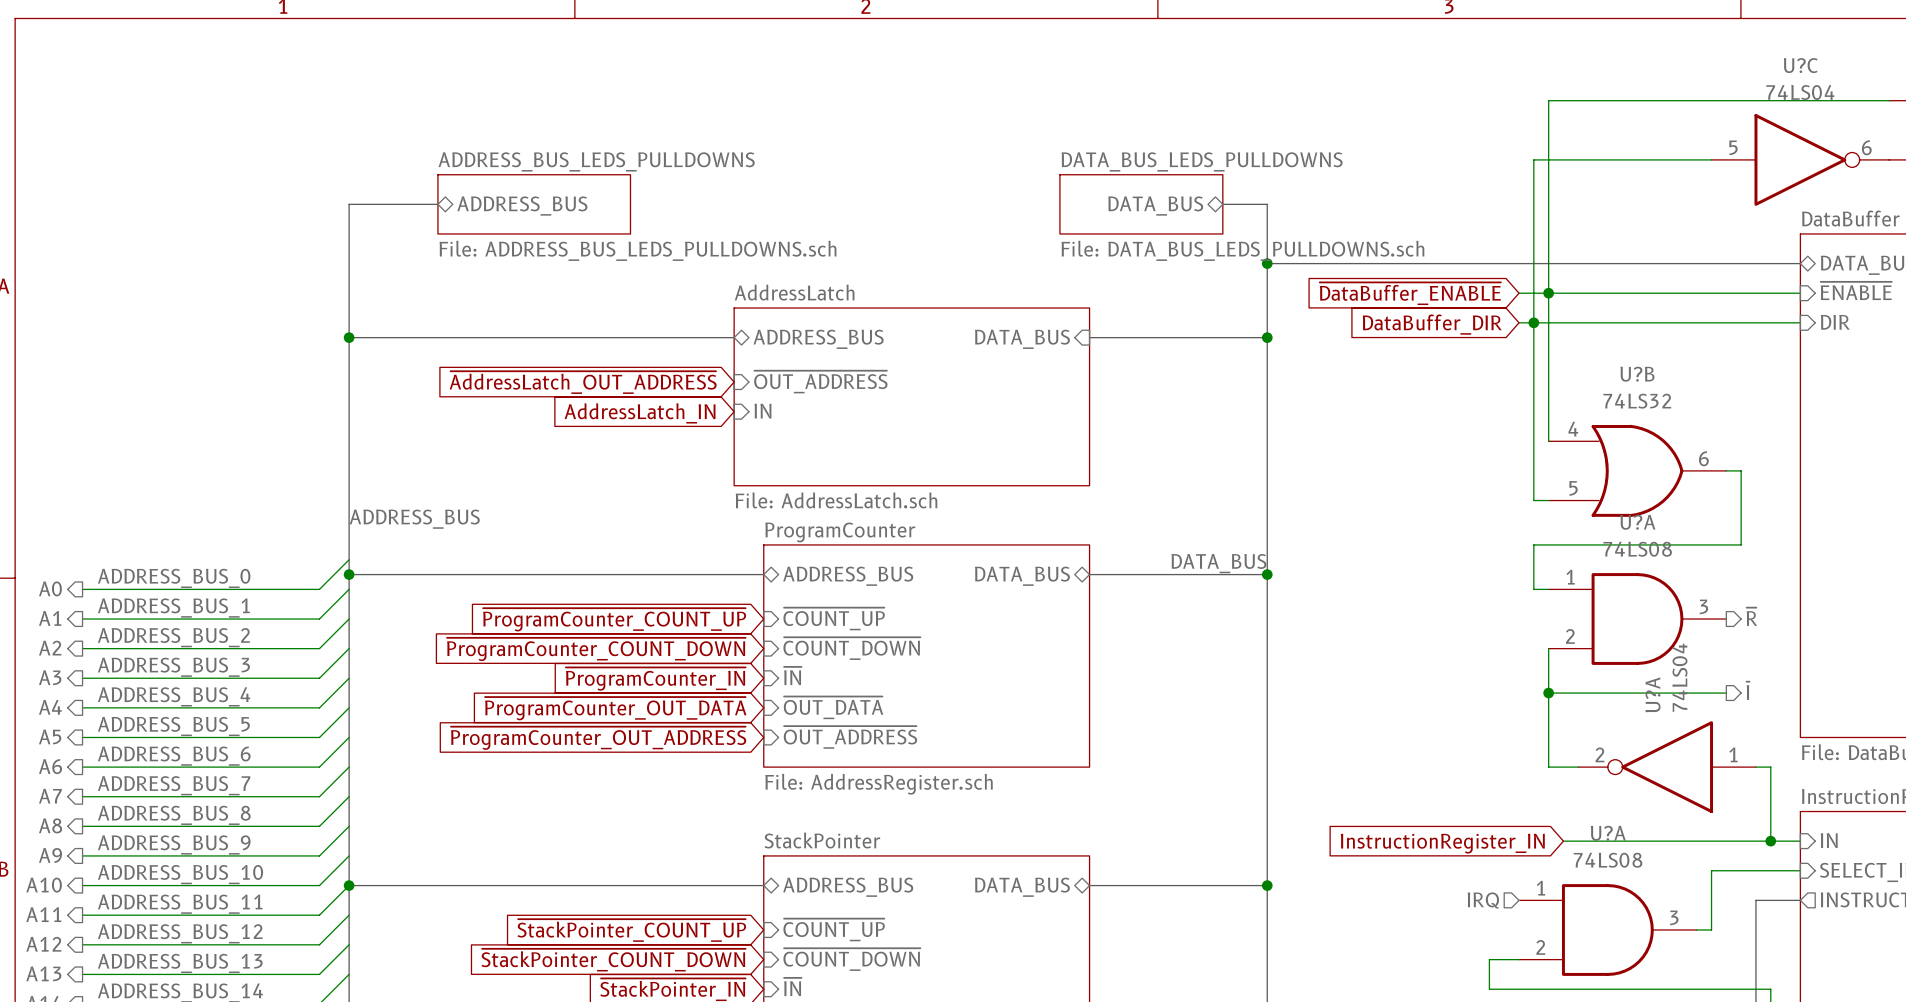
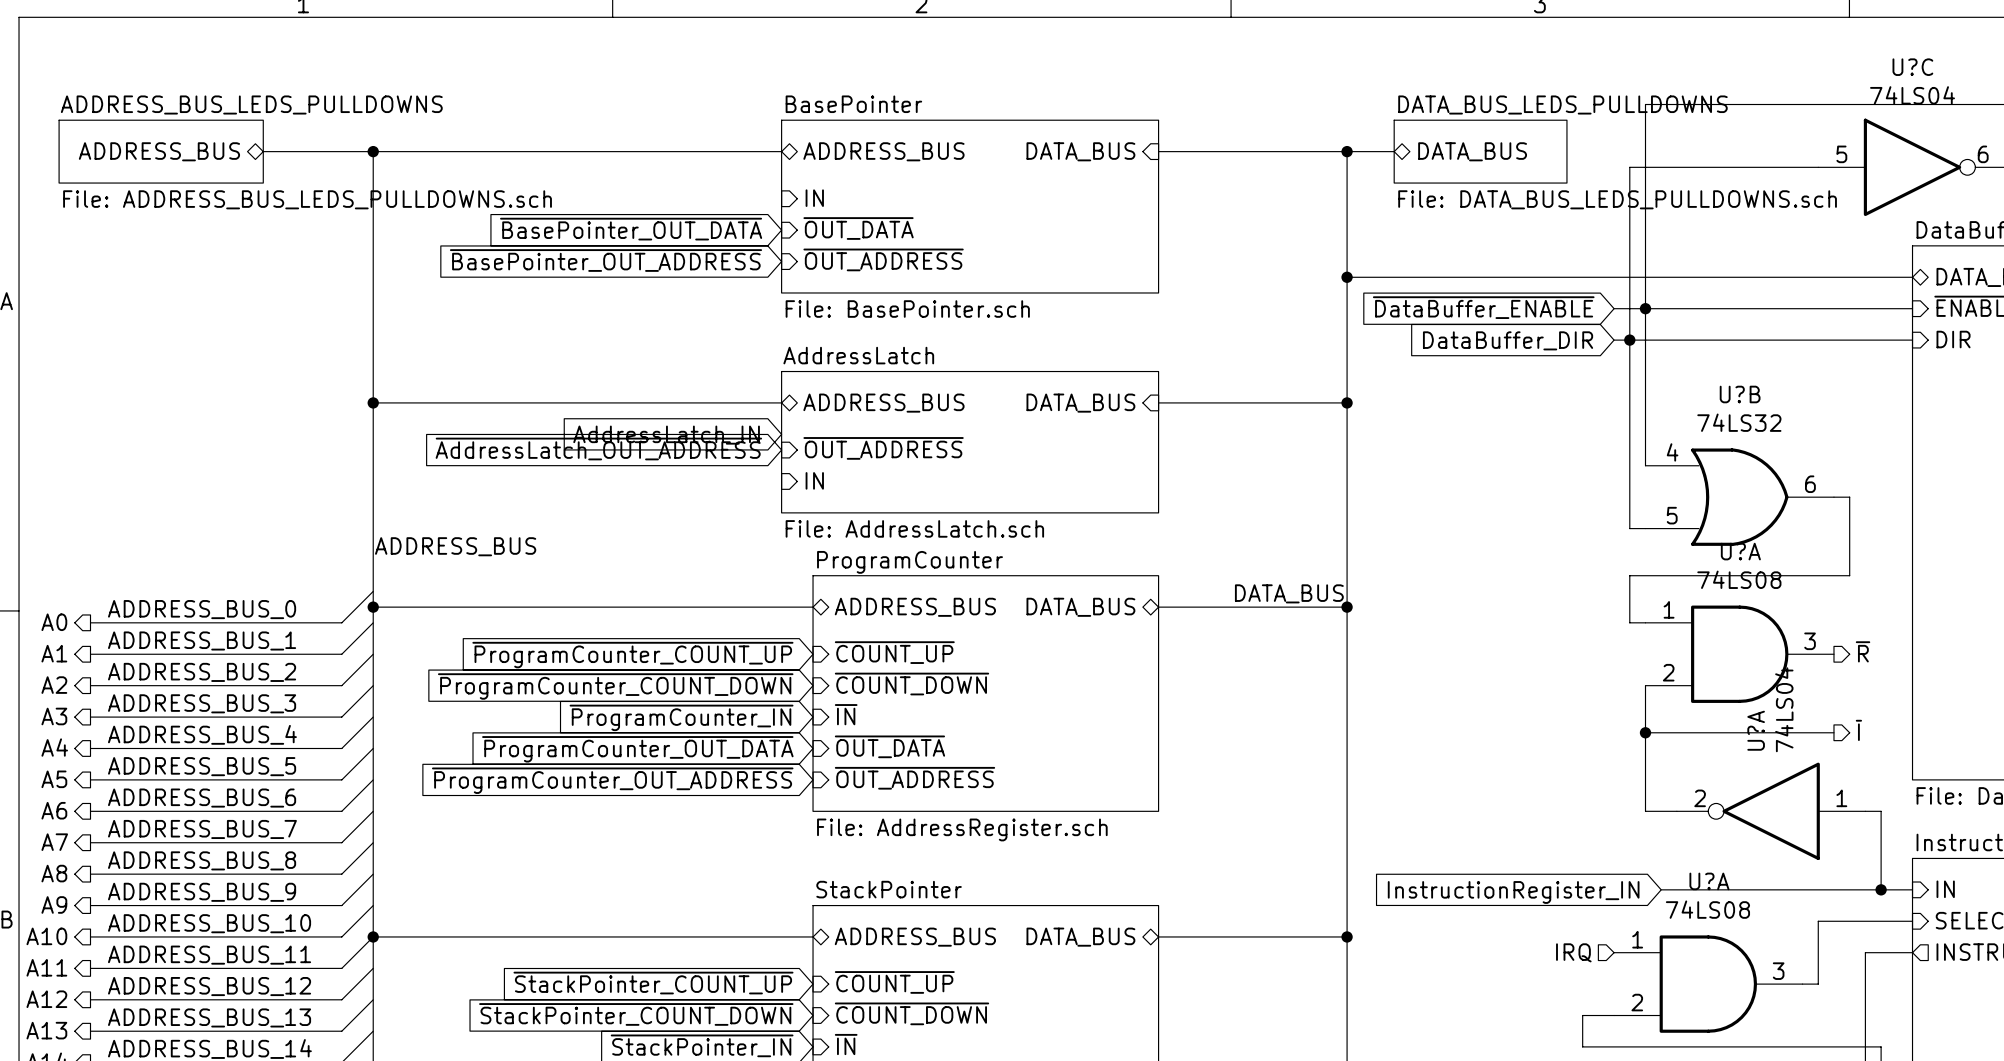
sheet ADDRESS_BUS_LEDS_PULLDOWNS: none -> File: ADDRESS_BUS_LEDS_PULLDOWNS.sch (161, 151)
bus: none -> (263, 151) (781, 151)
junction: none -> (373, 151)
bus: none -> (1158, 151) (1394, 151)
junction: none -> (1347, 151)
sheet pin: none -> ADDRESS_BUS (159, 151)
sheet pin: none -> ADDRESS_BUS (883, 151)
sheet pin: none -> DATA_BUS (1080, 151)
sheet pin: none -> DATA_BUS (1472, 151)
sheet pin: none -> IN (814, 198)
sheet BasePointer: none -> File: BasePointer.sch (970, 206)
bus: (349, 204) (437, 204) -> (373, 214) (373, 151)
sheet ADDRESS_BUS_LEDS_PULLDOWNS: File: ADDRESS_BUS_LEDS_PULLDOWNS.sch (534, 204) -> none
sheet DATA_BUS_LEDS_PULLDOWNS position: (1141, 204) -> (1480, 151)
bus: (1222, 204) (1267, 204) -> (1347, 151) (1347, 214)
sheet pin: ADDRESS_BUS (522, 206) -> none
sheet pin: DATA_BUS (1155, 206) -> none
global label: none -> ~{BasePointer_OUT_DATA} (631, 229)
sheet pin: none -> ~{OUT_DATA} (858, 228)
sheet pin: none -> ~{OUT_ADDRESS} (883, 259)
global label: none -> ~{BasePointer_OUT_ADDRESS} (606, 260)
bus: (349, 337) (734, 337) -> (373, 402) (781, 402)
junction position: (349, 337) -> (373, 402)
bus: (1089, 337) (1267, 337) -> (1158, 402) (1347, 402)
junction position: (1267, 337) -> (1347, 402)
sheet pin: ADDRESS_BUS (818, 339) -> none
sheet pin position: DATA_BUS (1022, 339) -> DATA_BUS (1080, 403)
global label position: ~{AddressLatch_OUT_ADDRESS} (583, 382) -> ~{AddressLatch_OUT_ADDRESS} (598, 449)
sheet pin shape: input (820, 382) -> bidirectional (883, 403)
sheet pin: ~{OUT_ADDRESS} (820, 382) -> ADDRESS_BUS (883, 403)
sheet AddressLatch: File: AddressLatch.sch (911, 396) -> none
sheet pin position: IN (762, 411) -> IN (814, 480)
sheet AddressLatch: none -> File: AddressLatch.sch (970, 442)
sheet pin: none -> ~{OUT_ADDRESS} (883, 448)

